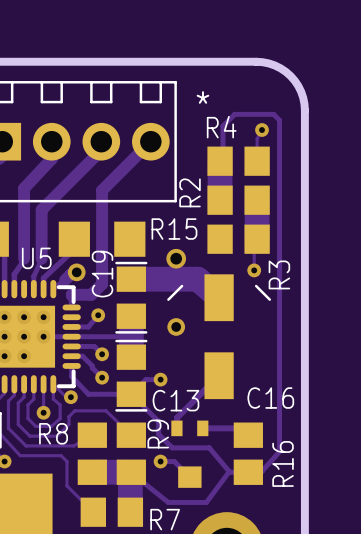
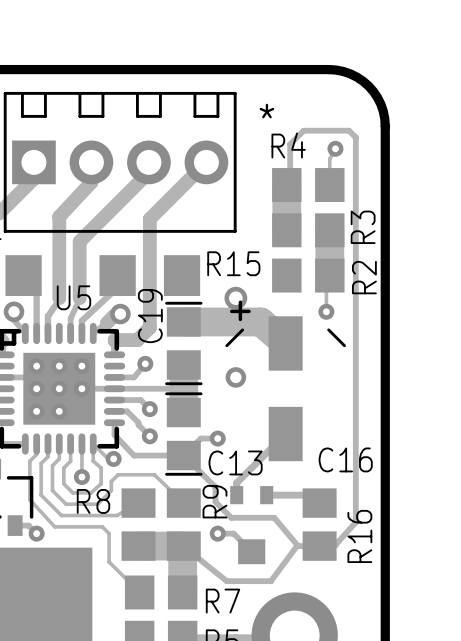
R2 name position: R2 (190, 192) -> R2 (364, 277)
C16 footprint: [167, 274, 272, 400] -> [225, 300, 346, 462]
R3 name position: R3 (279, 274) -> R3 (363, 227)

